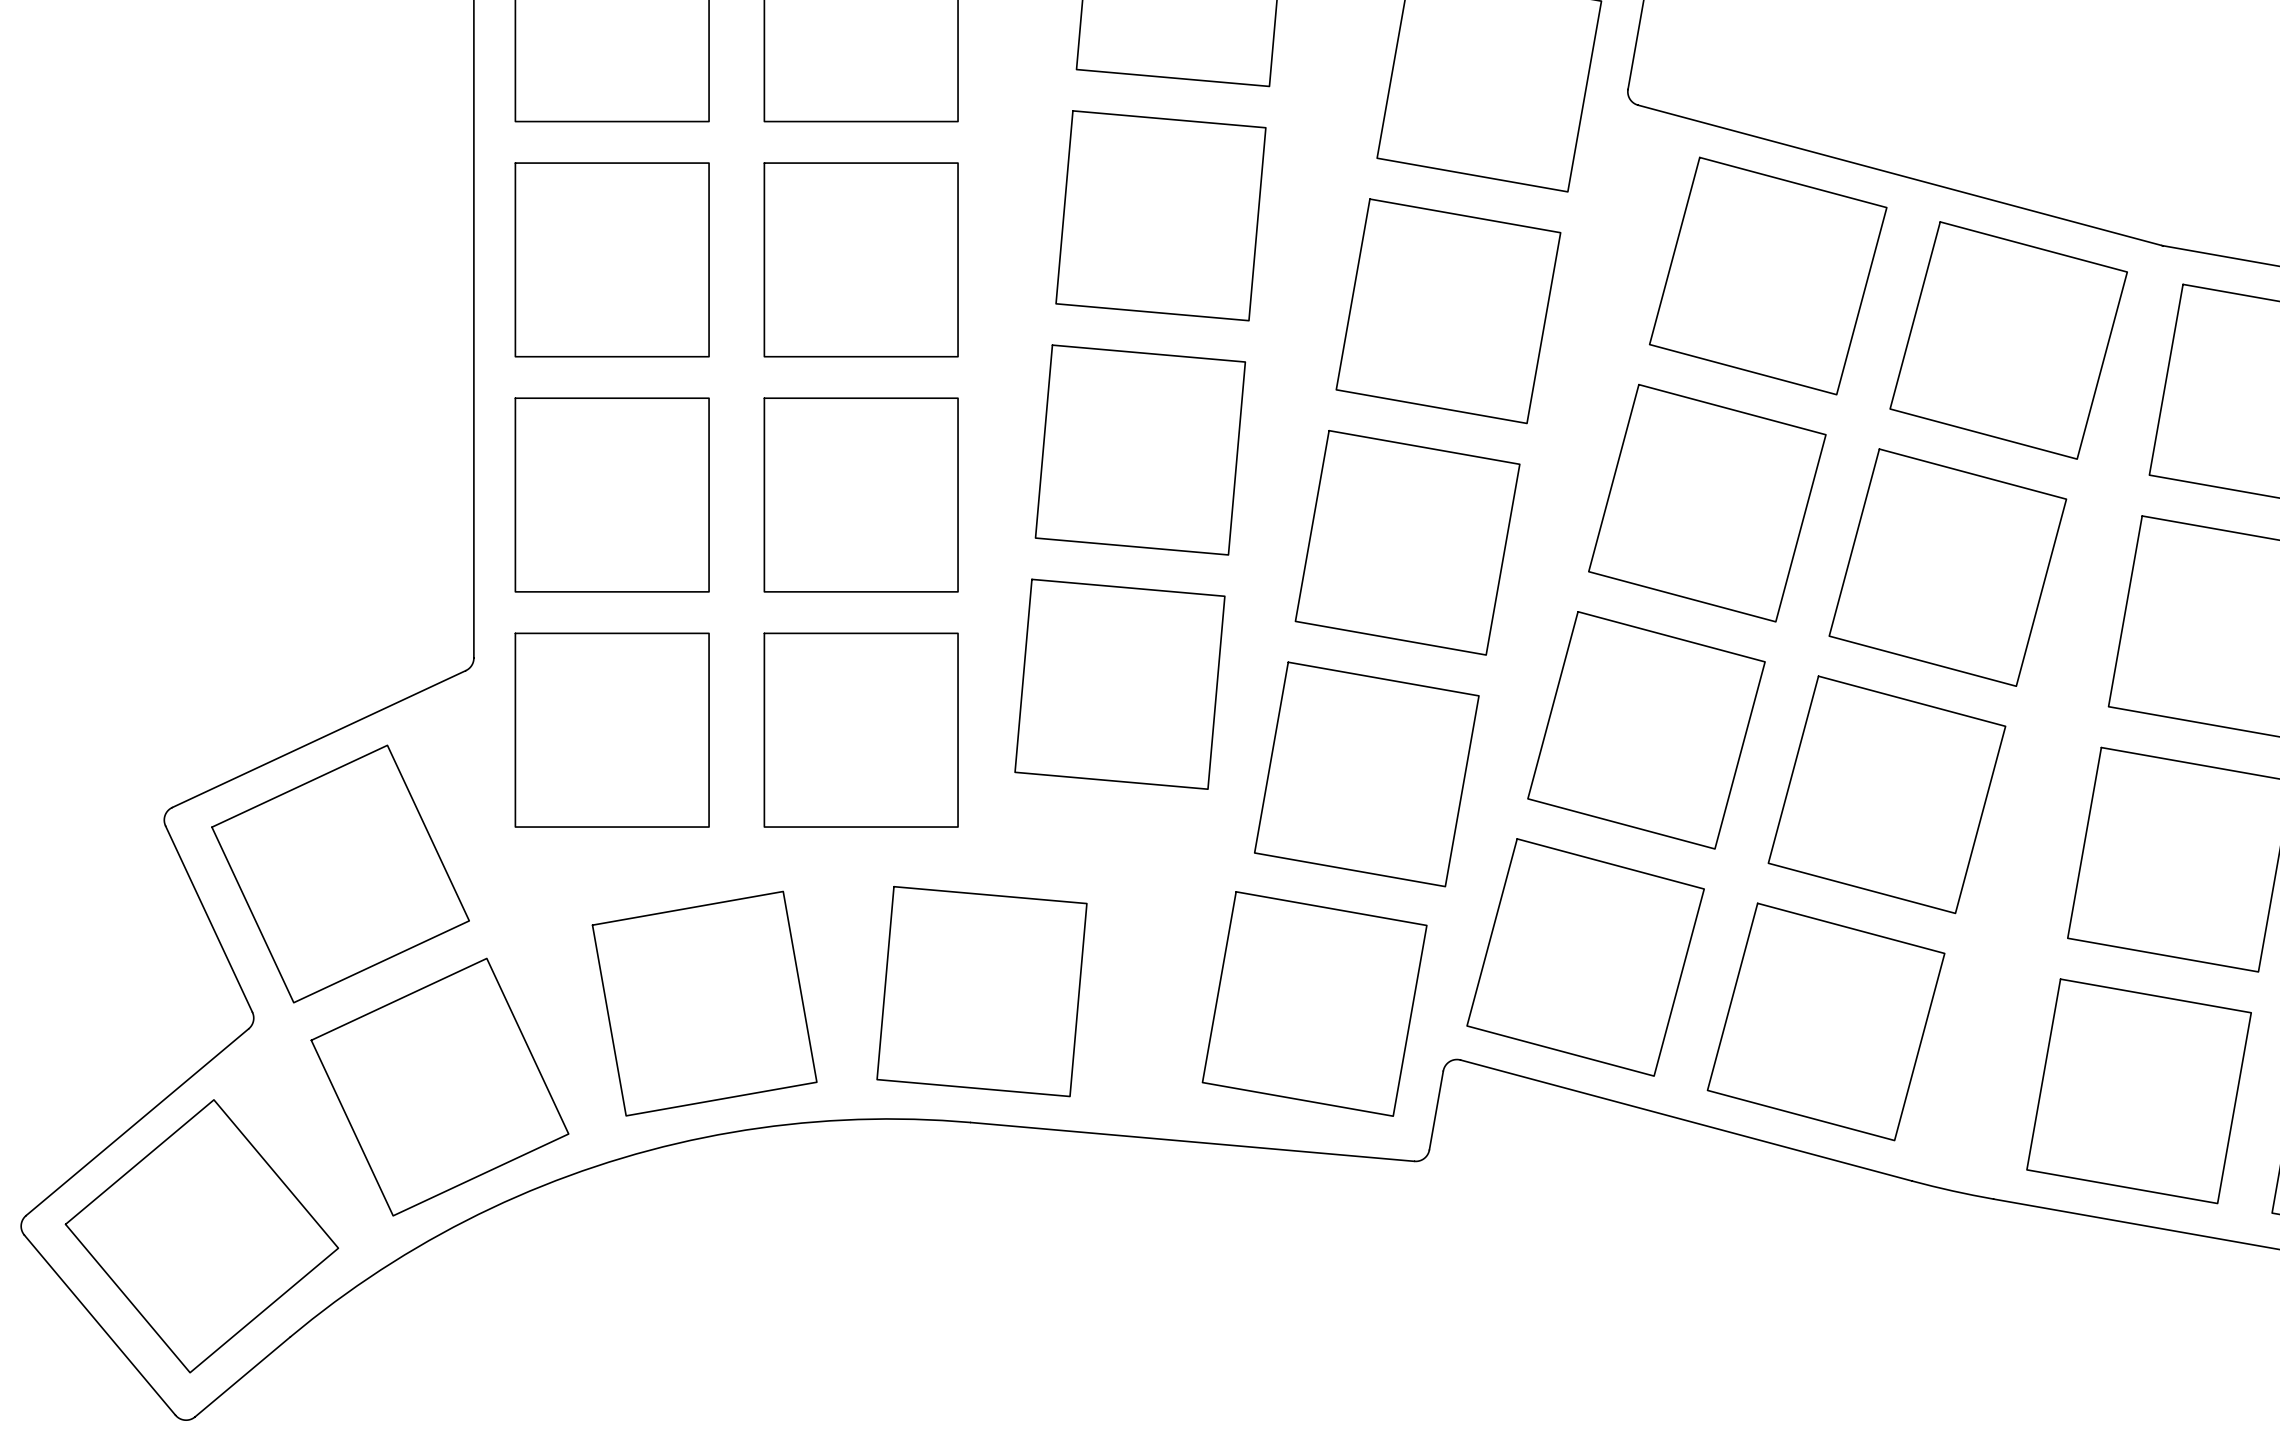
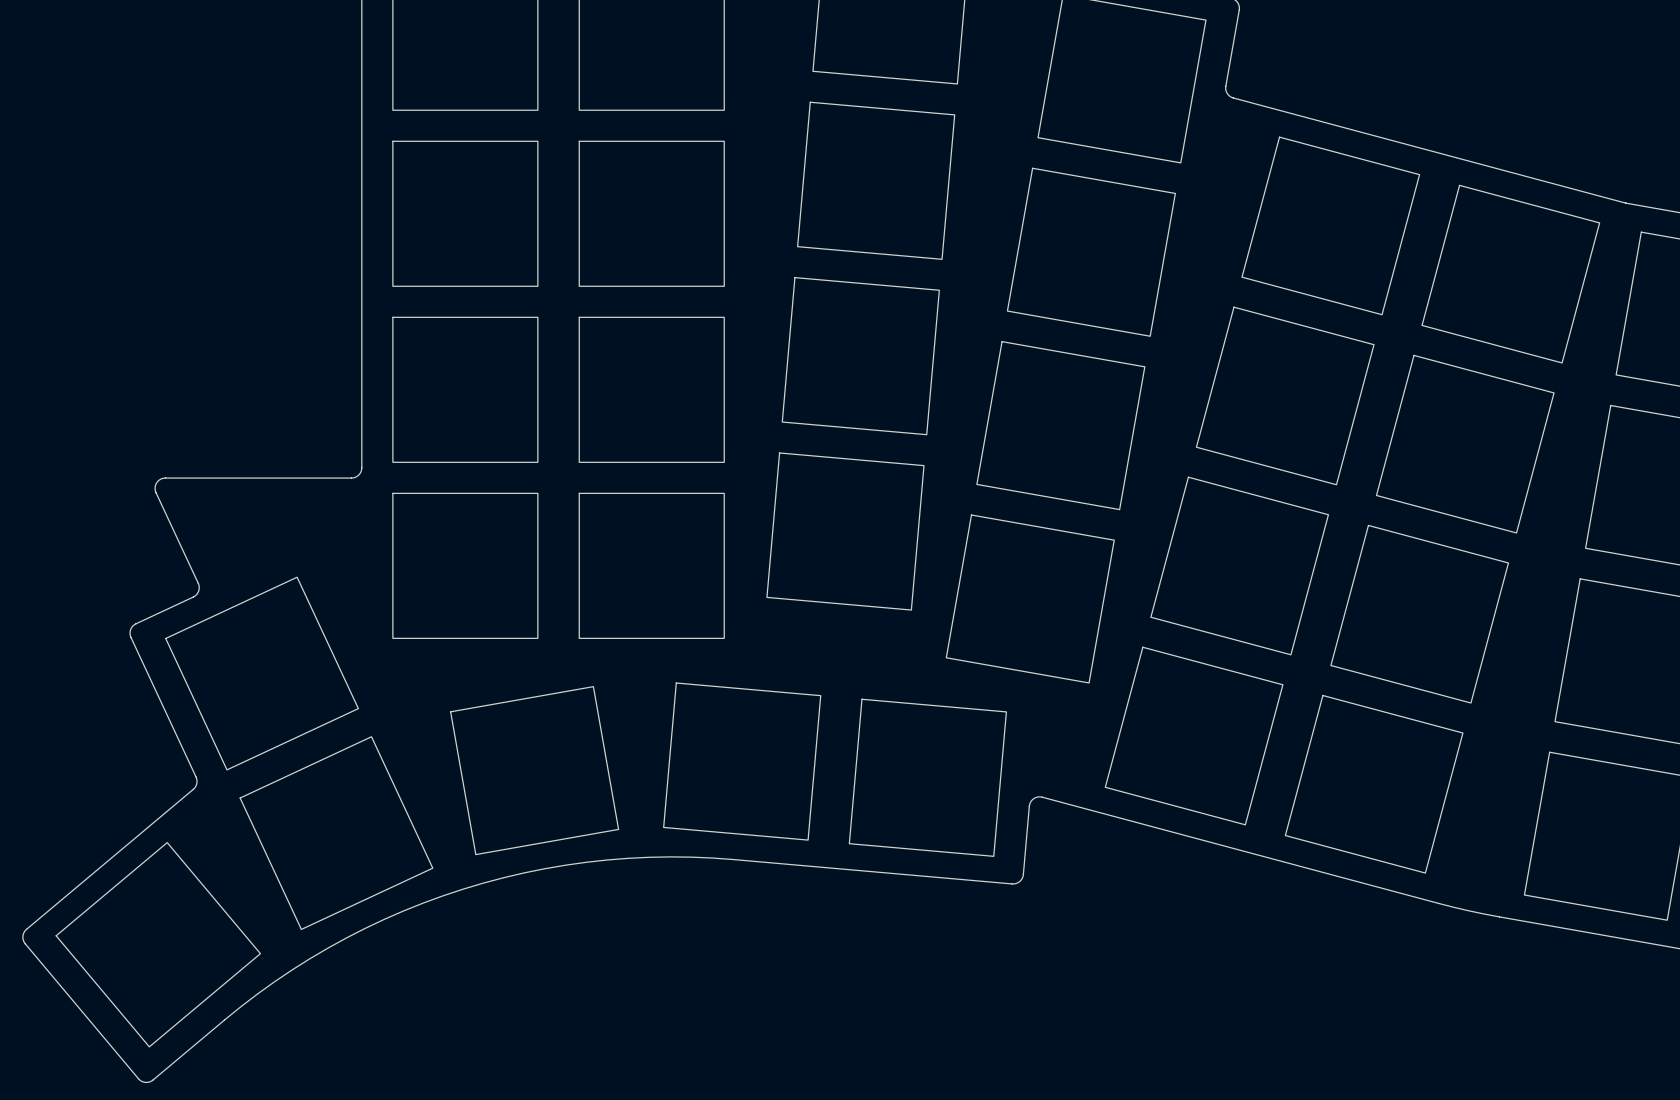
board edge: (473, 599) (473, 659) (468, 669) (248, 771) -> (361, 467) (359, 474) (352, 477) (165, 478) (159, 480) (155, 485) (155, 491) (198, 584) (198, 592) (193, 597)
drawing: [1201, 891, 1428, 1118] -> none
drawing: none -> [848, 698, 1008, 857]
board edge: (1460, 1060) (1450, 1060) (1444, 1067) (1429, 1149) (1424, 1158) (1414, 1161) (1342, 1155) -> (1100, 812) (1041, 796) (1032, 799) (1029, 806) (1023, 875) (1018, 882) (1012, 883)

